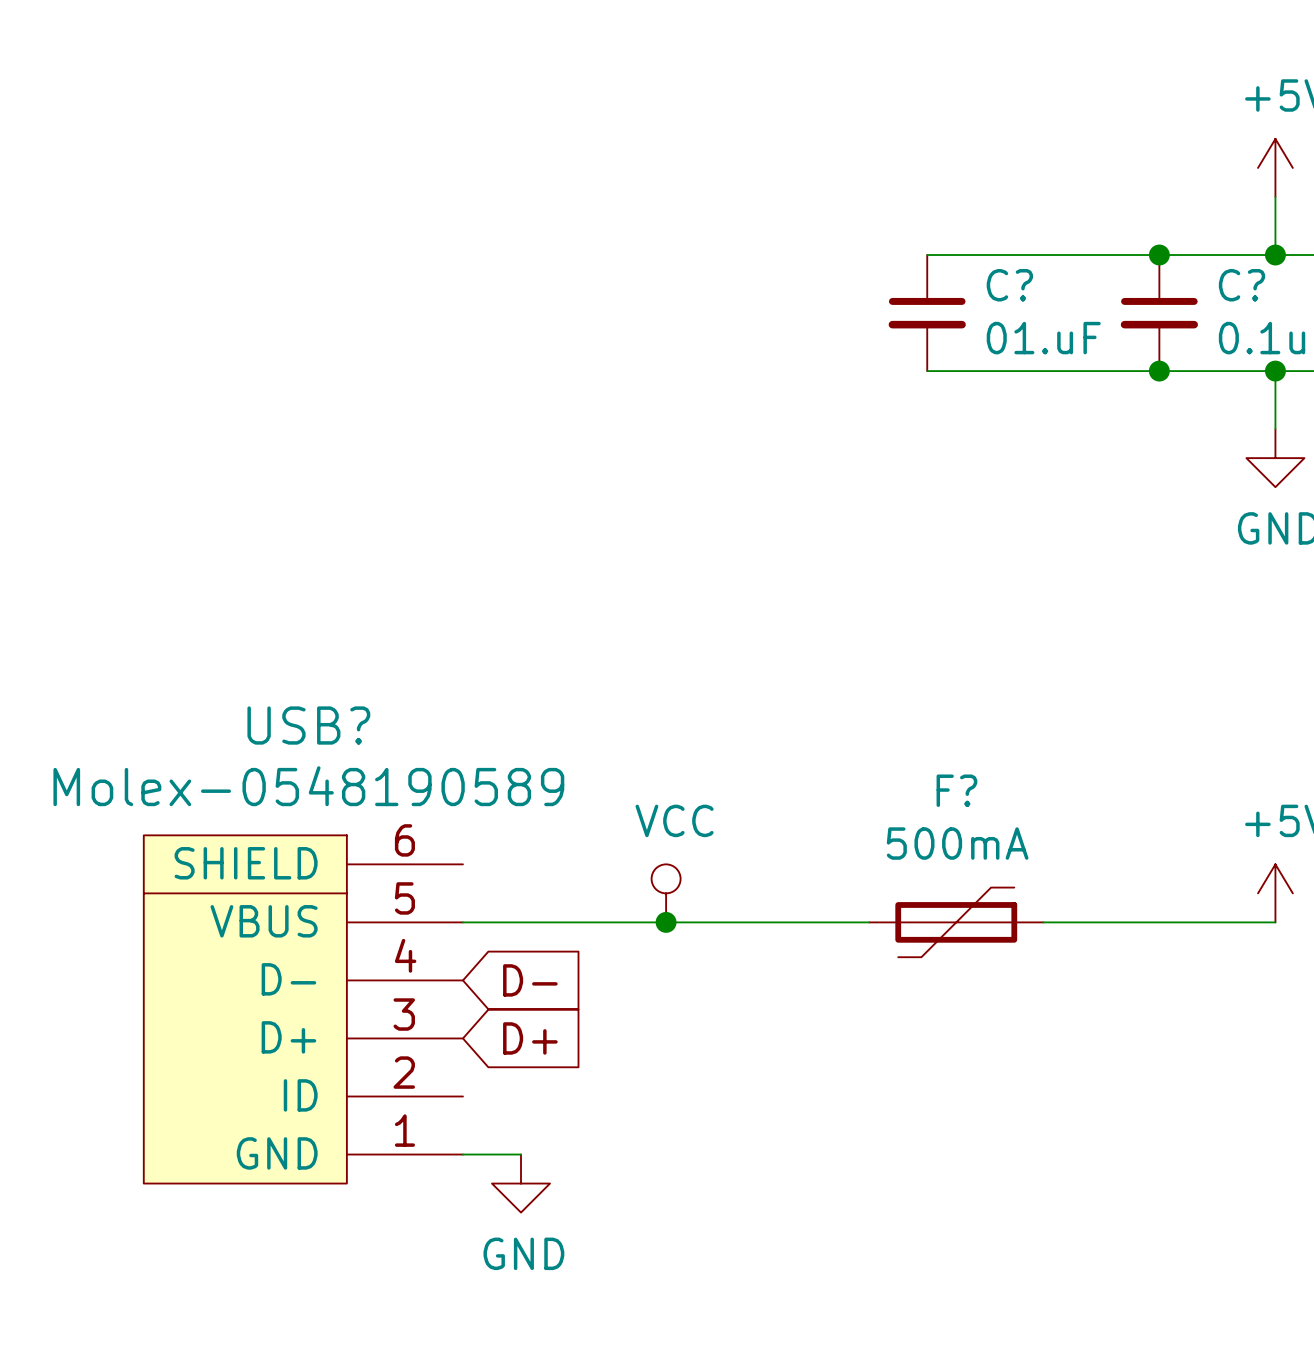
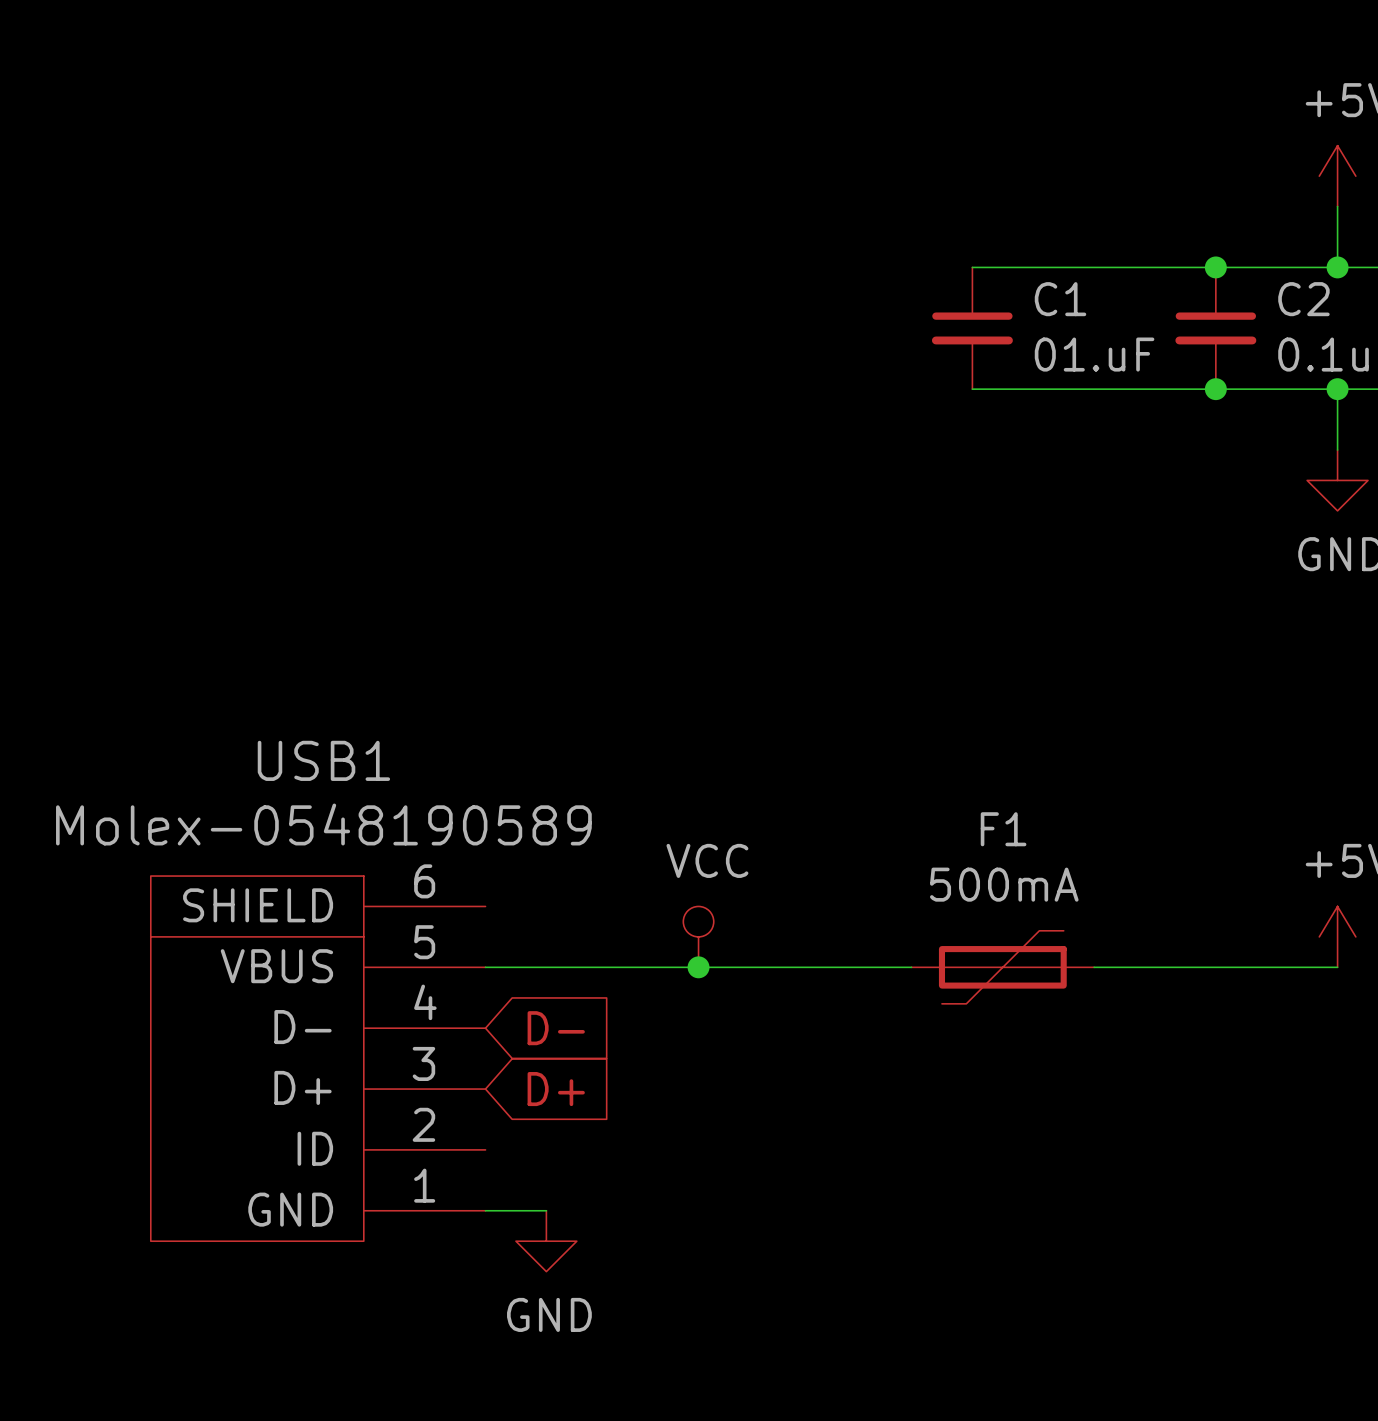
C? name: C? (1009, 285) -> C1 (1060, 299)
C? name: C? (1241, 285) -> C2 (1303, 299)
USB? name: USB? (308, 725) -> USB1 (323, 760)
F? name: F? (956, 790) -> F1 (1003, 829)

